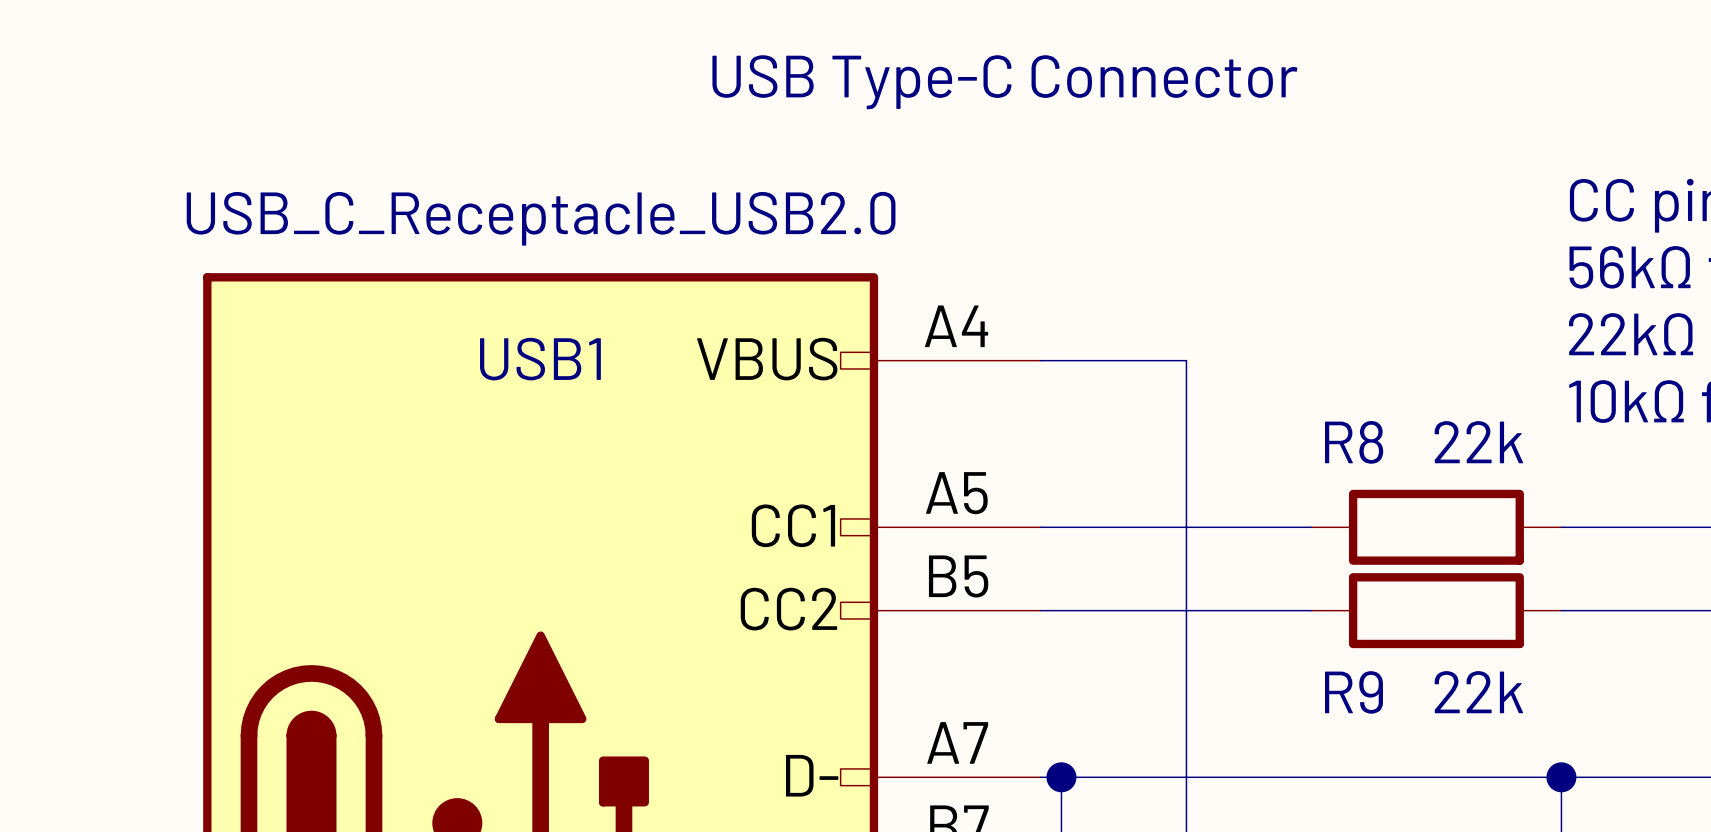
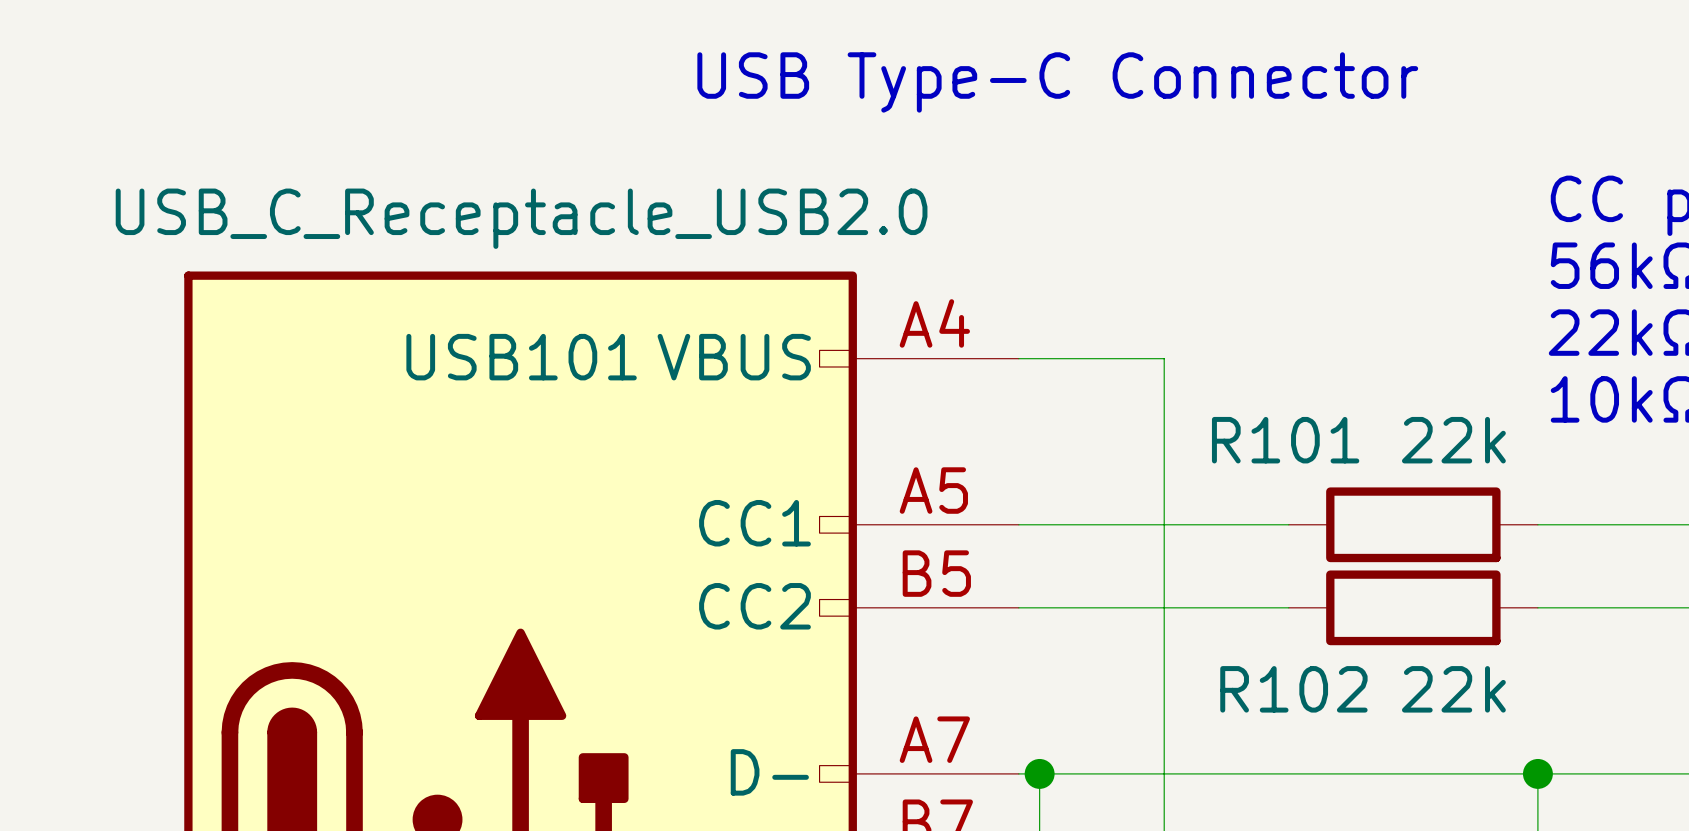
USB1 name: USB1 (540, 359) -> USB101 (521, 357)
R8 name: R8 (1354, 442) -> R101 (1285, 440)
R9 name: R9 (1353, 692) -> R102 (1293, 689)

